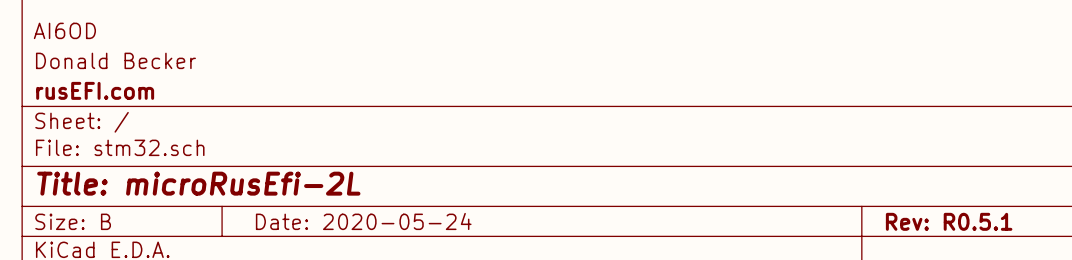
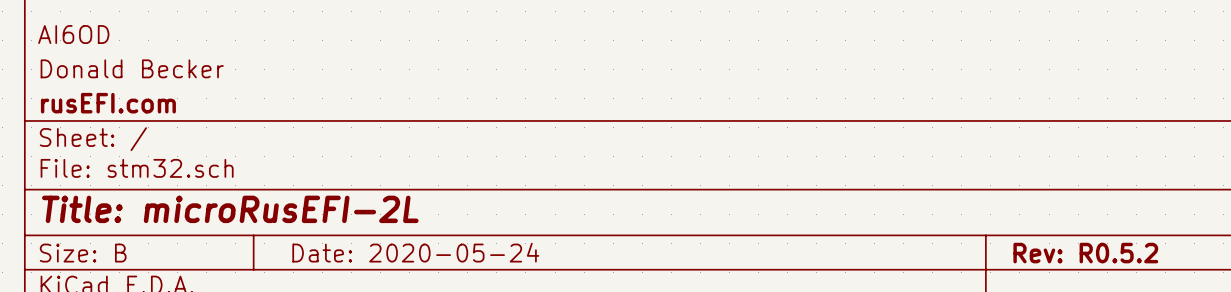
title block: Title: microRusEfi-2L (198, 183) -> Title: microRusEFI-2L (230, 209)
title block: Rev: R0.5.1 (949, 221) -> Rev: R0.5.2 (1085, 253)

